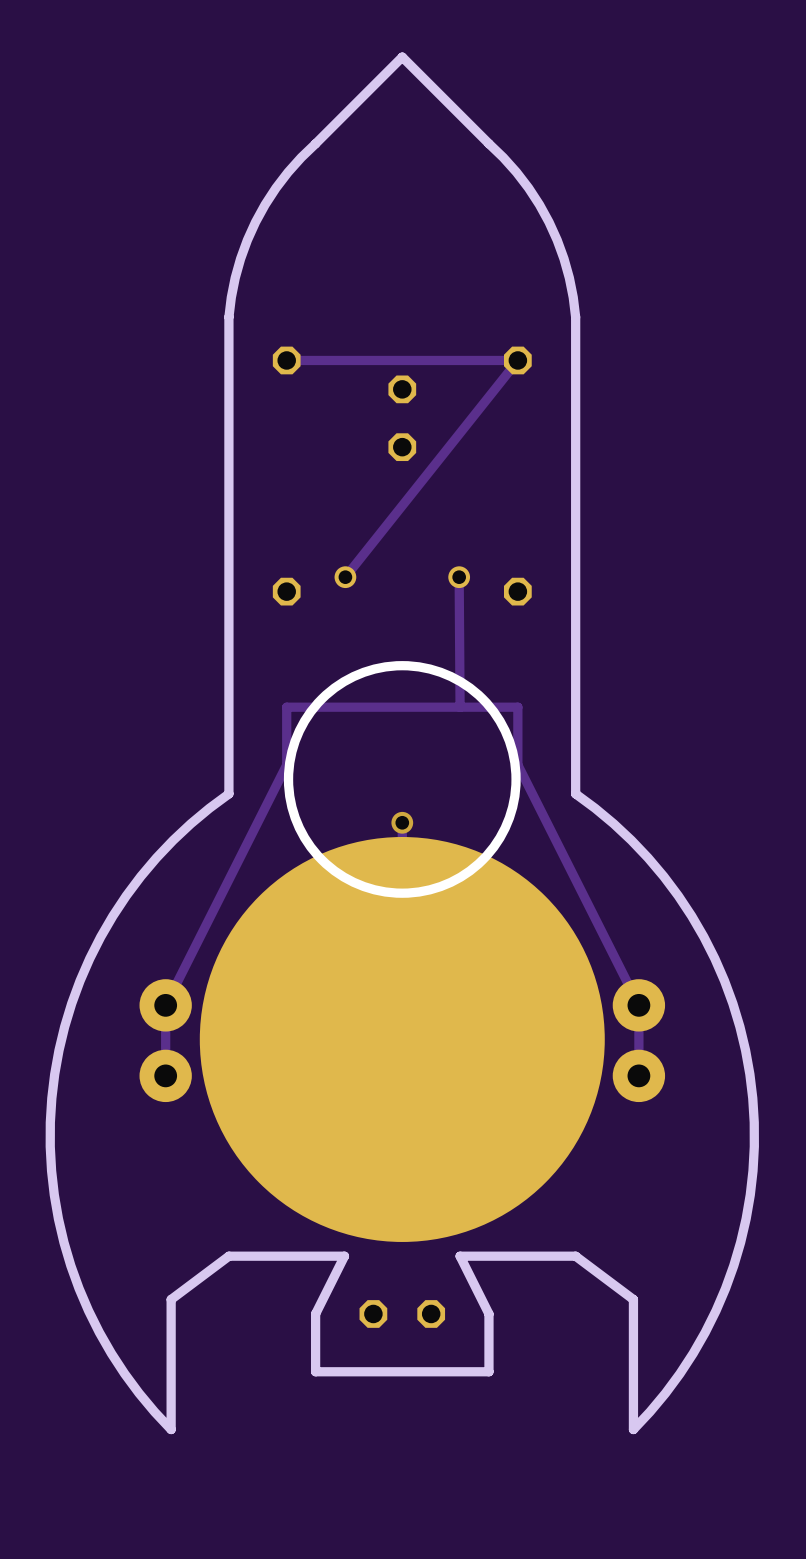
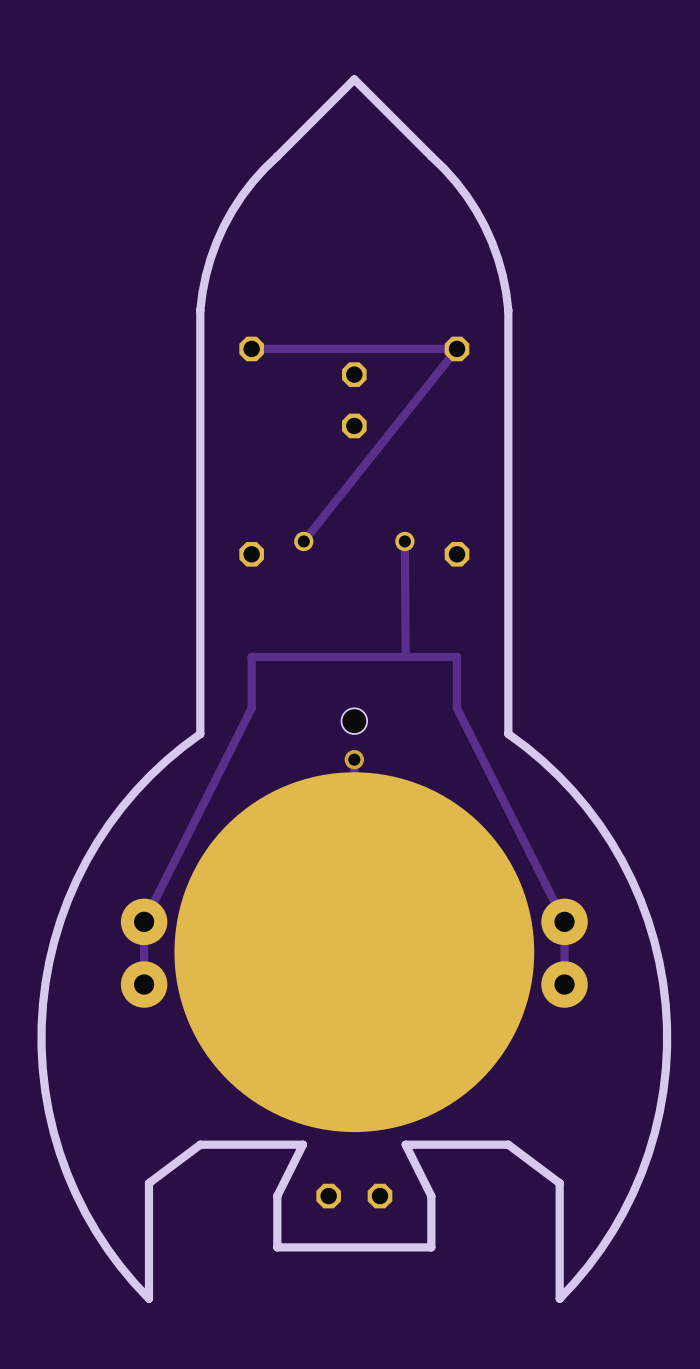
drawing: [283, 661, 521, 898] -> none
hole: none -> (354, 721)

